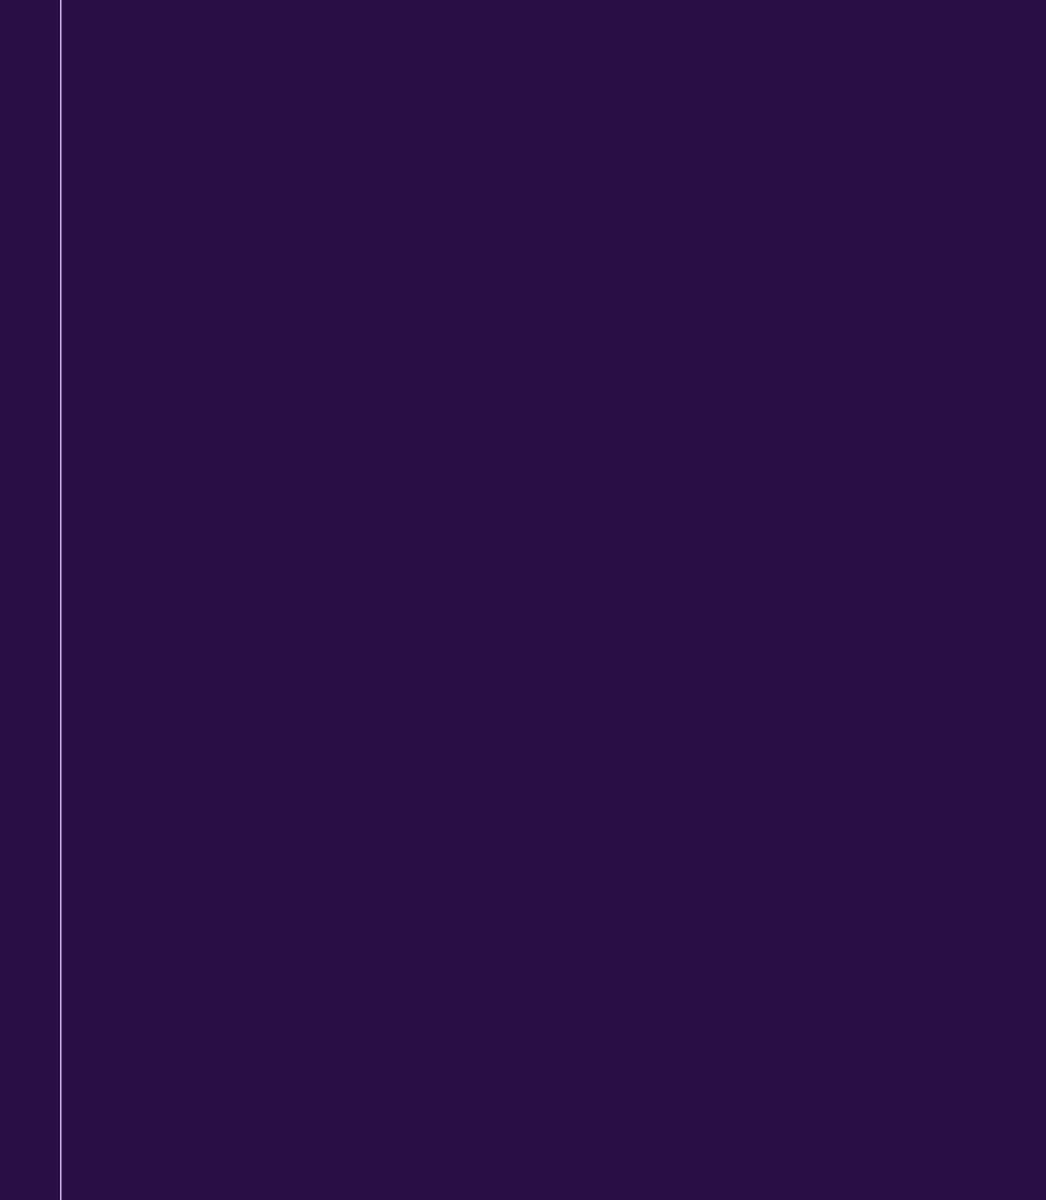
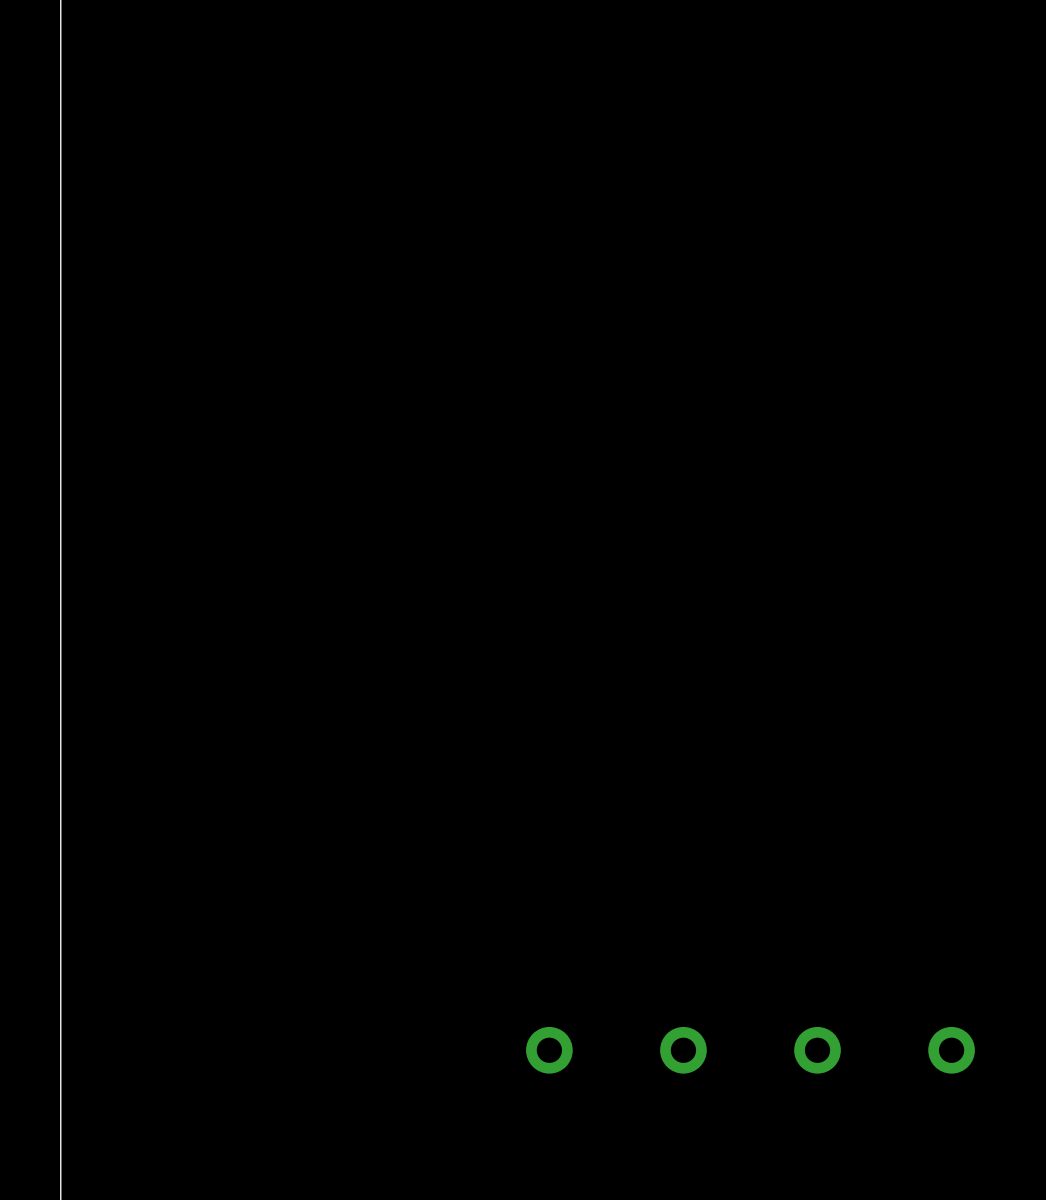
part: none -> (549, 1050)
part: none -> (683, 1050)
part: none -> (817, 1050)
part: none -> (951, 1050)

